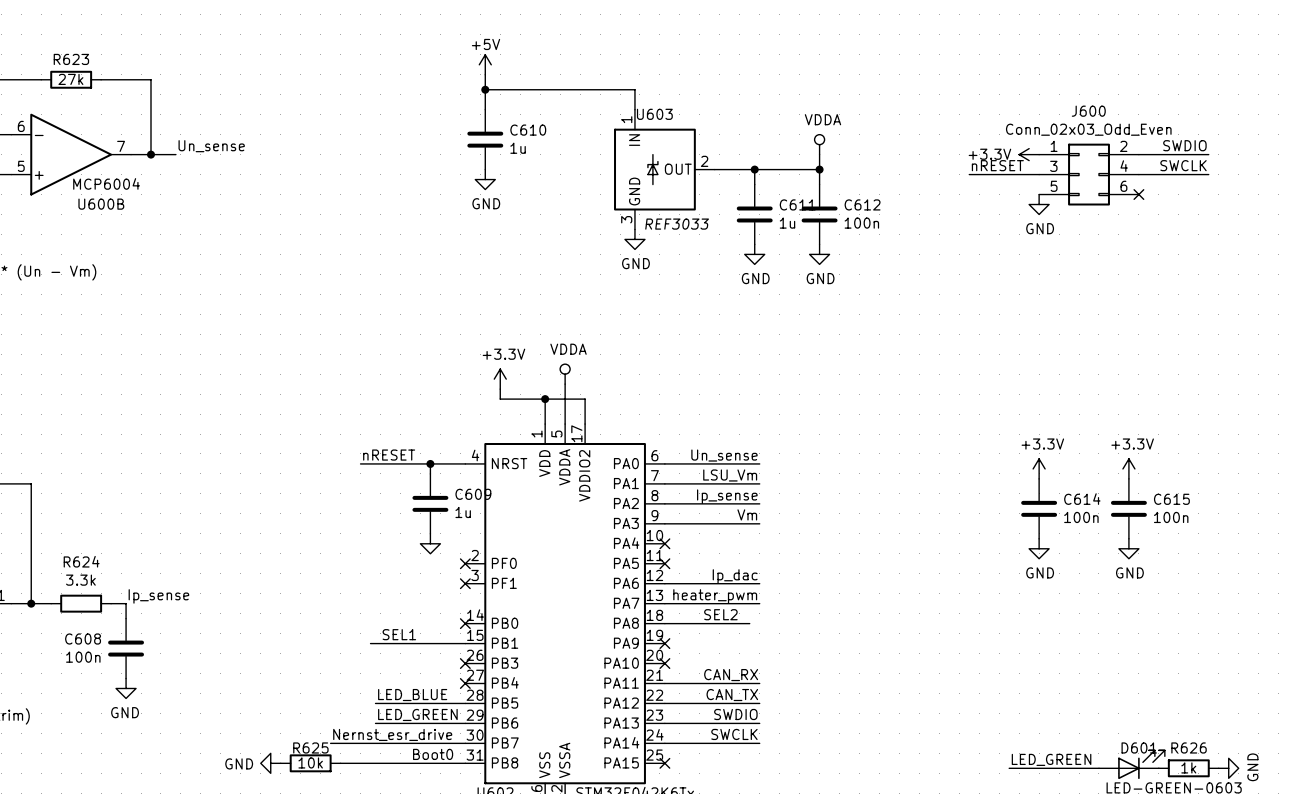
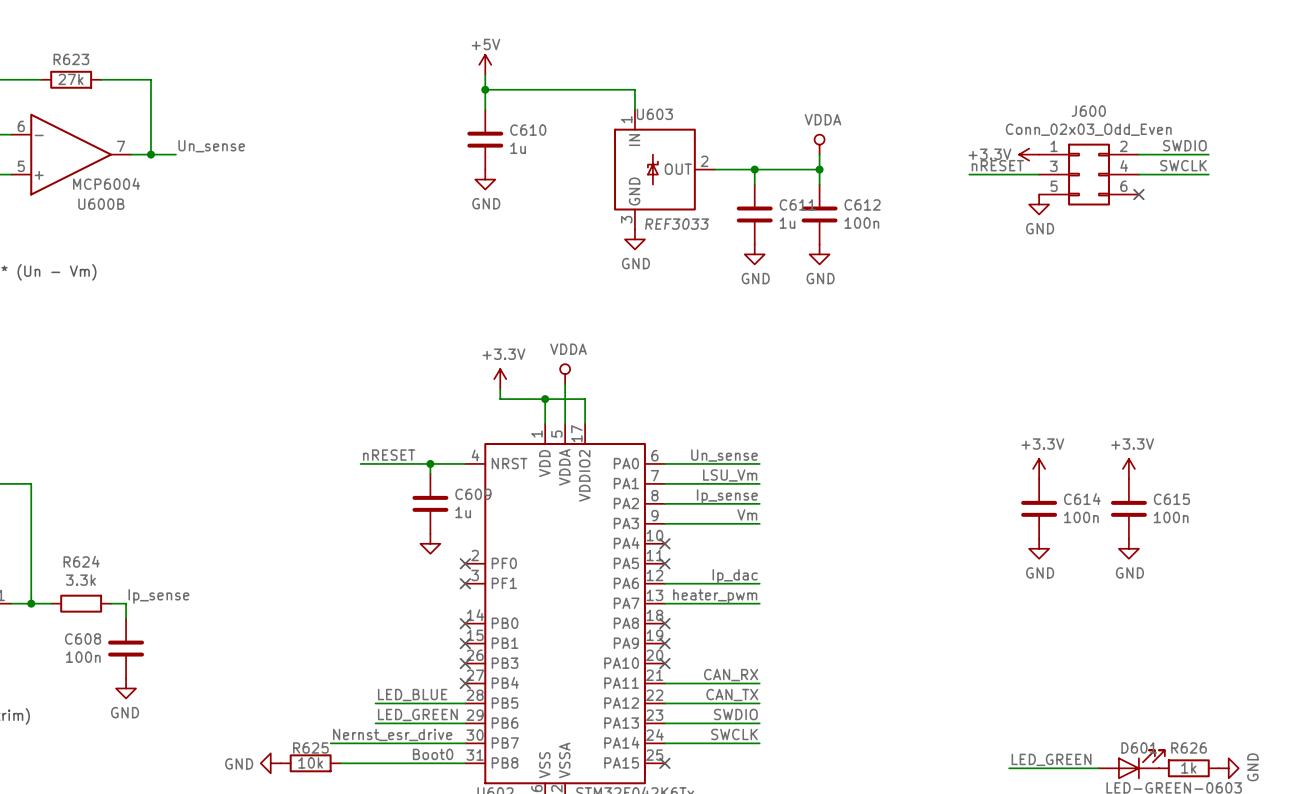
label: SEL2 (720, 614) -> none
wire: (664, 623) (749, 623) -> none
no-connect mark: none -> (664, 623)
label: SEL1 (399, 634) -> none
wire: (370, 643) (465, 643) -> none
no-connect mark: none -> (465, 643)

